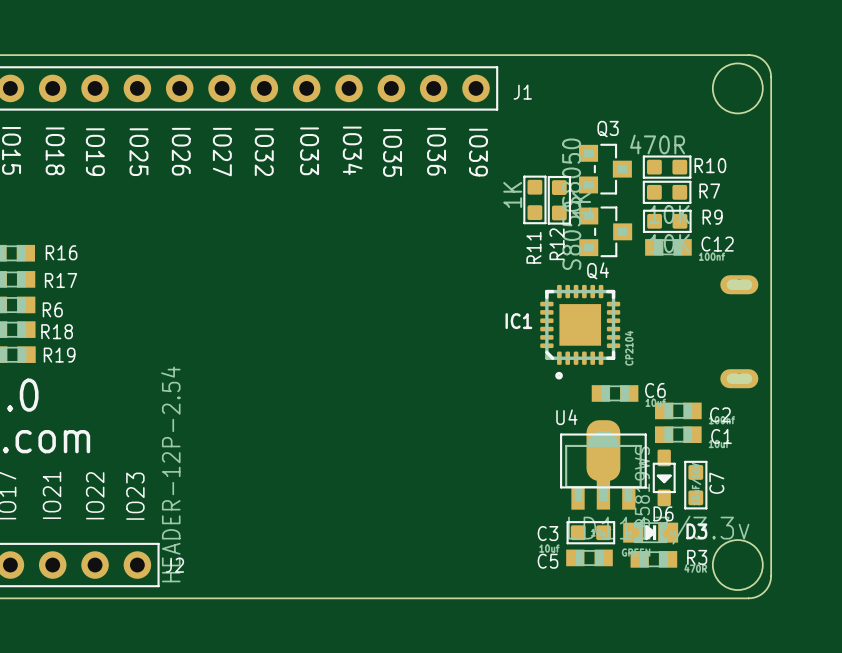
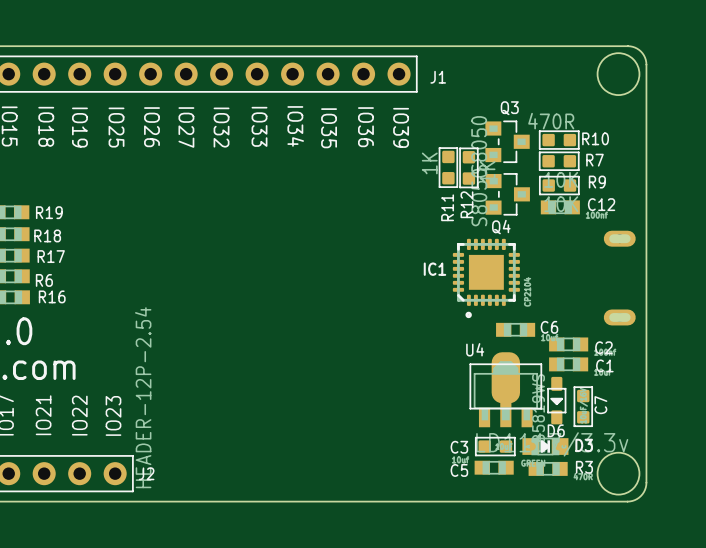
R16 name: R16 (61, 252) -> R19 (49, 212)
R17 name: R17 (61, 280) -> R18 (47, 235)
R6 name: R6 (52, 309) -> R17 (51, 256)
R18 name: R18 (57, 331) -> R6 (44, 280)
R19 name: R19 (59, 355) -> R16 (52, 296)

